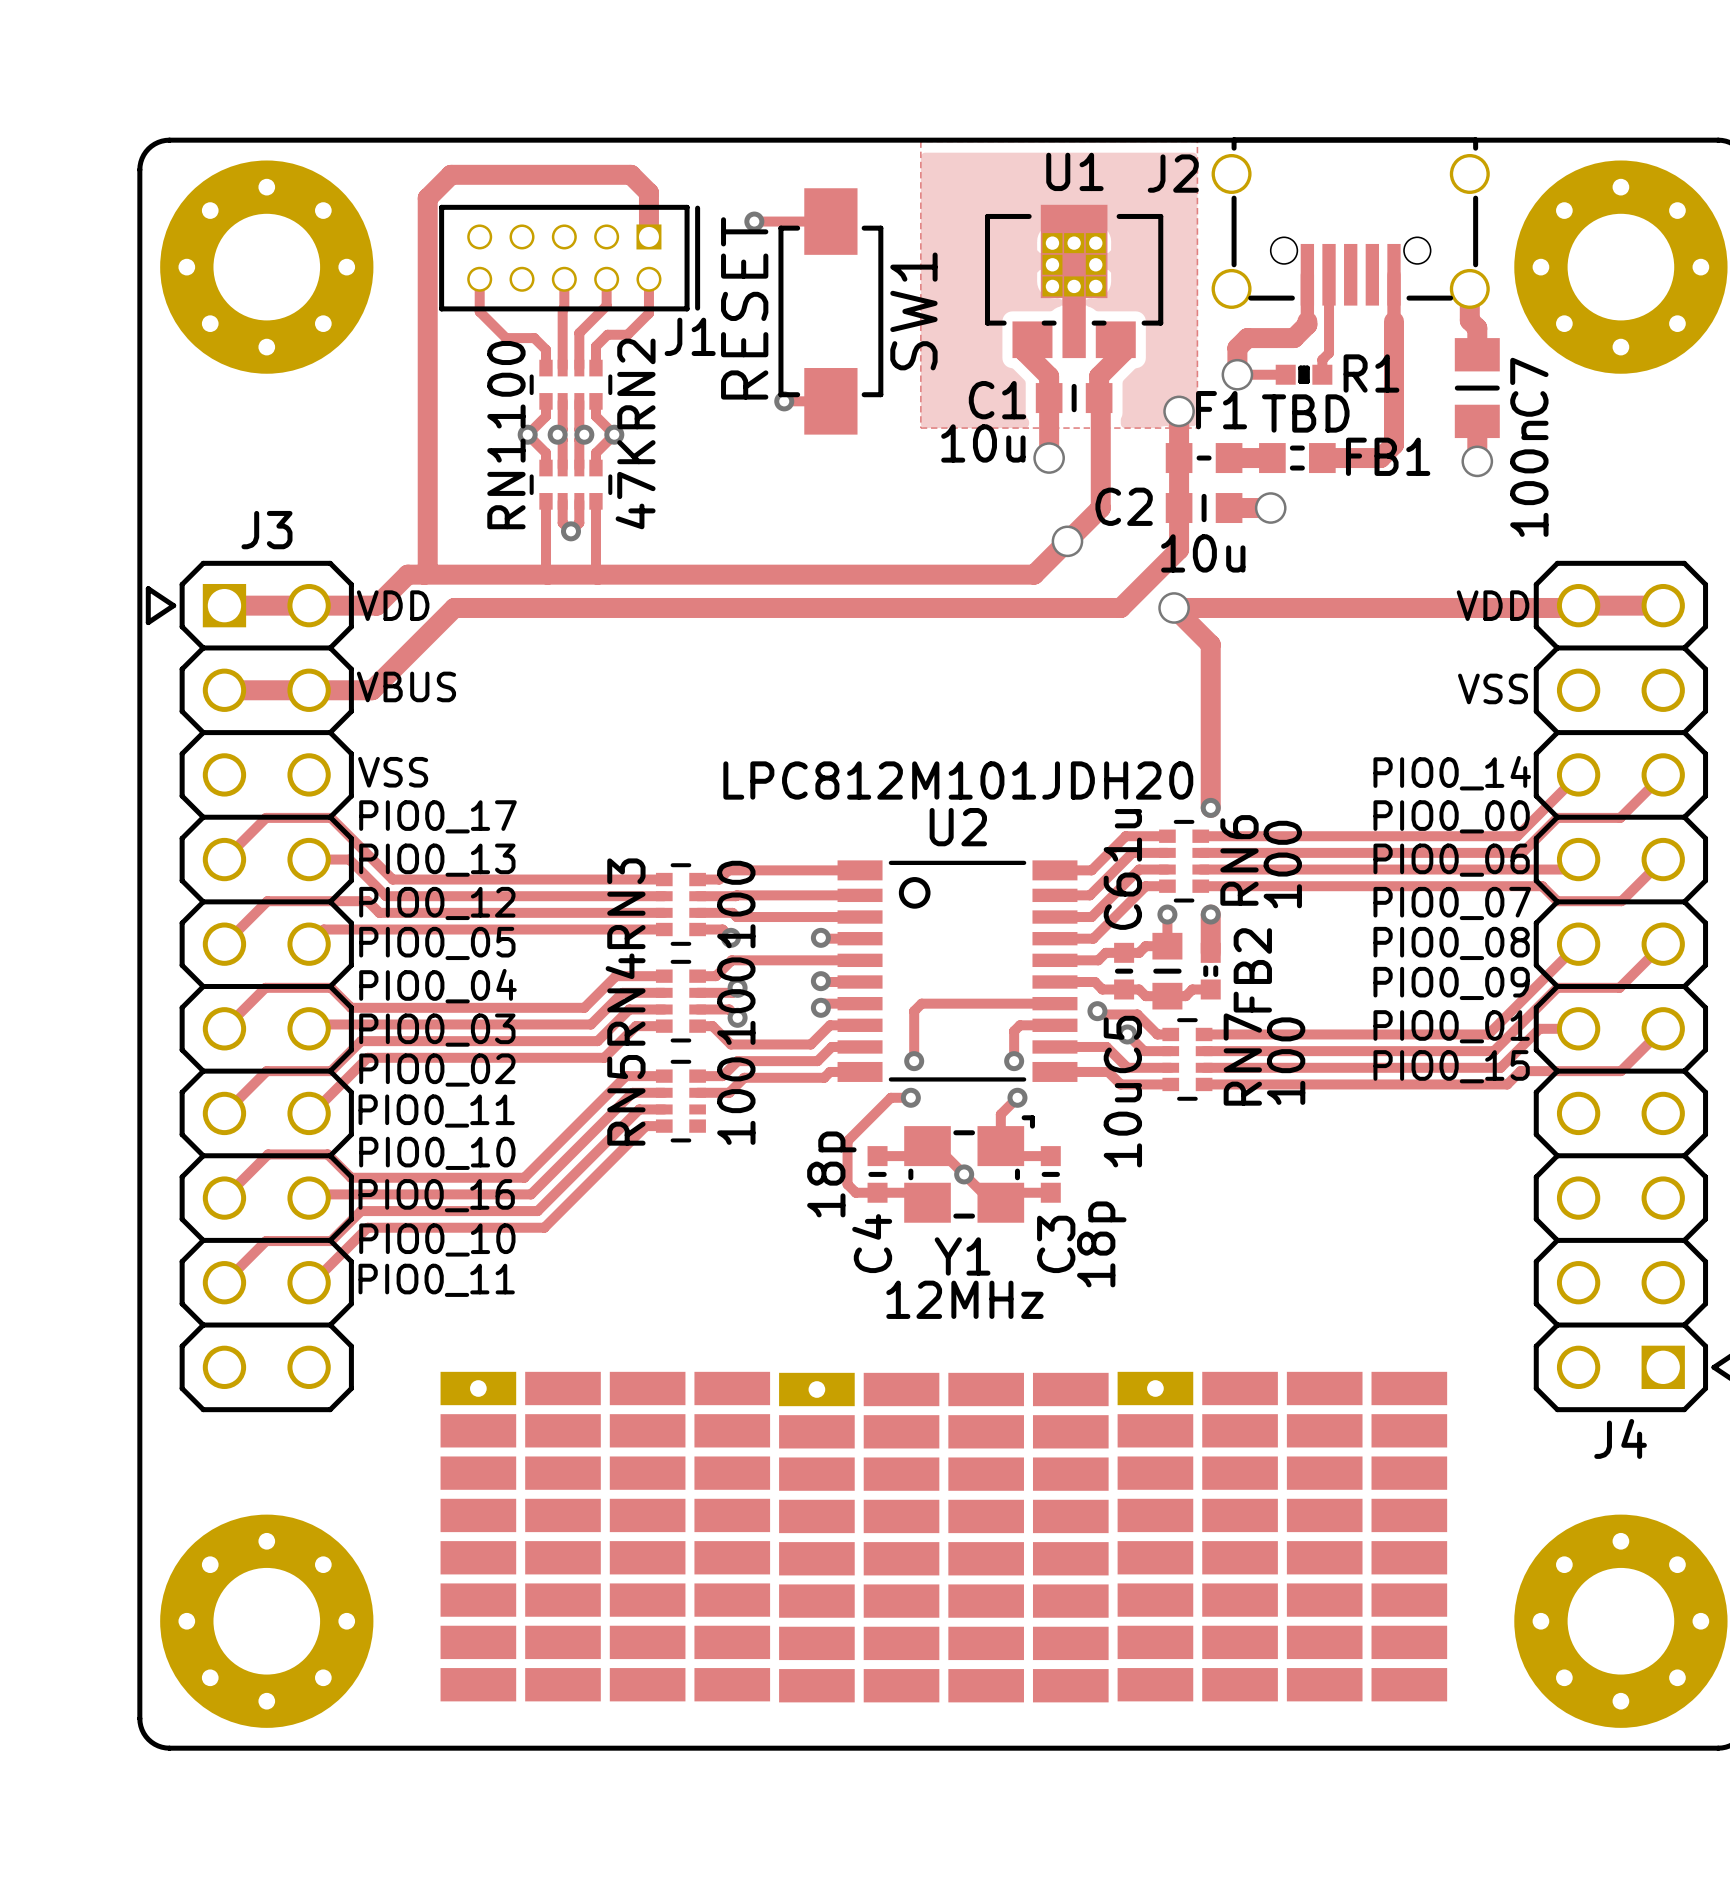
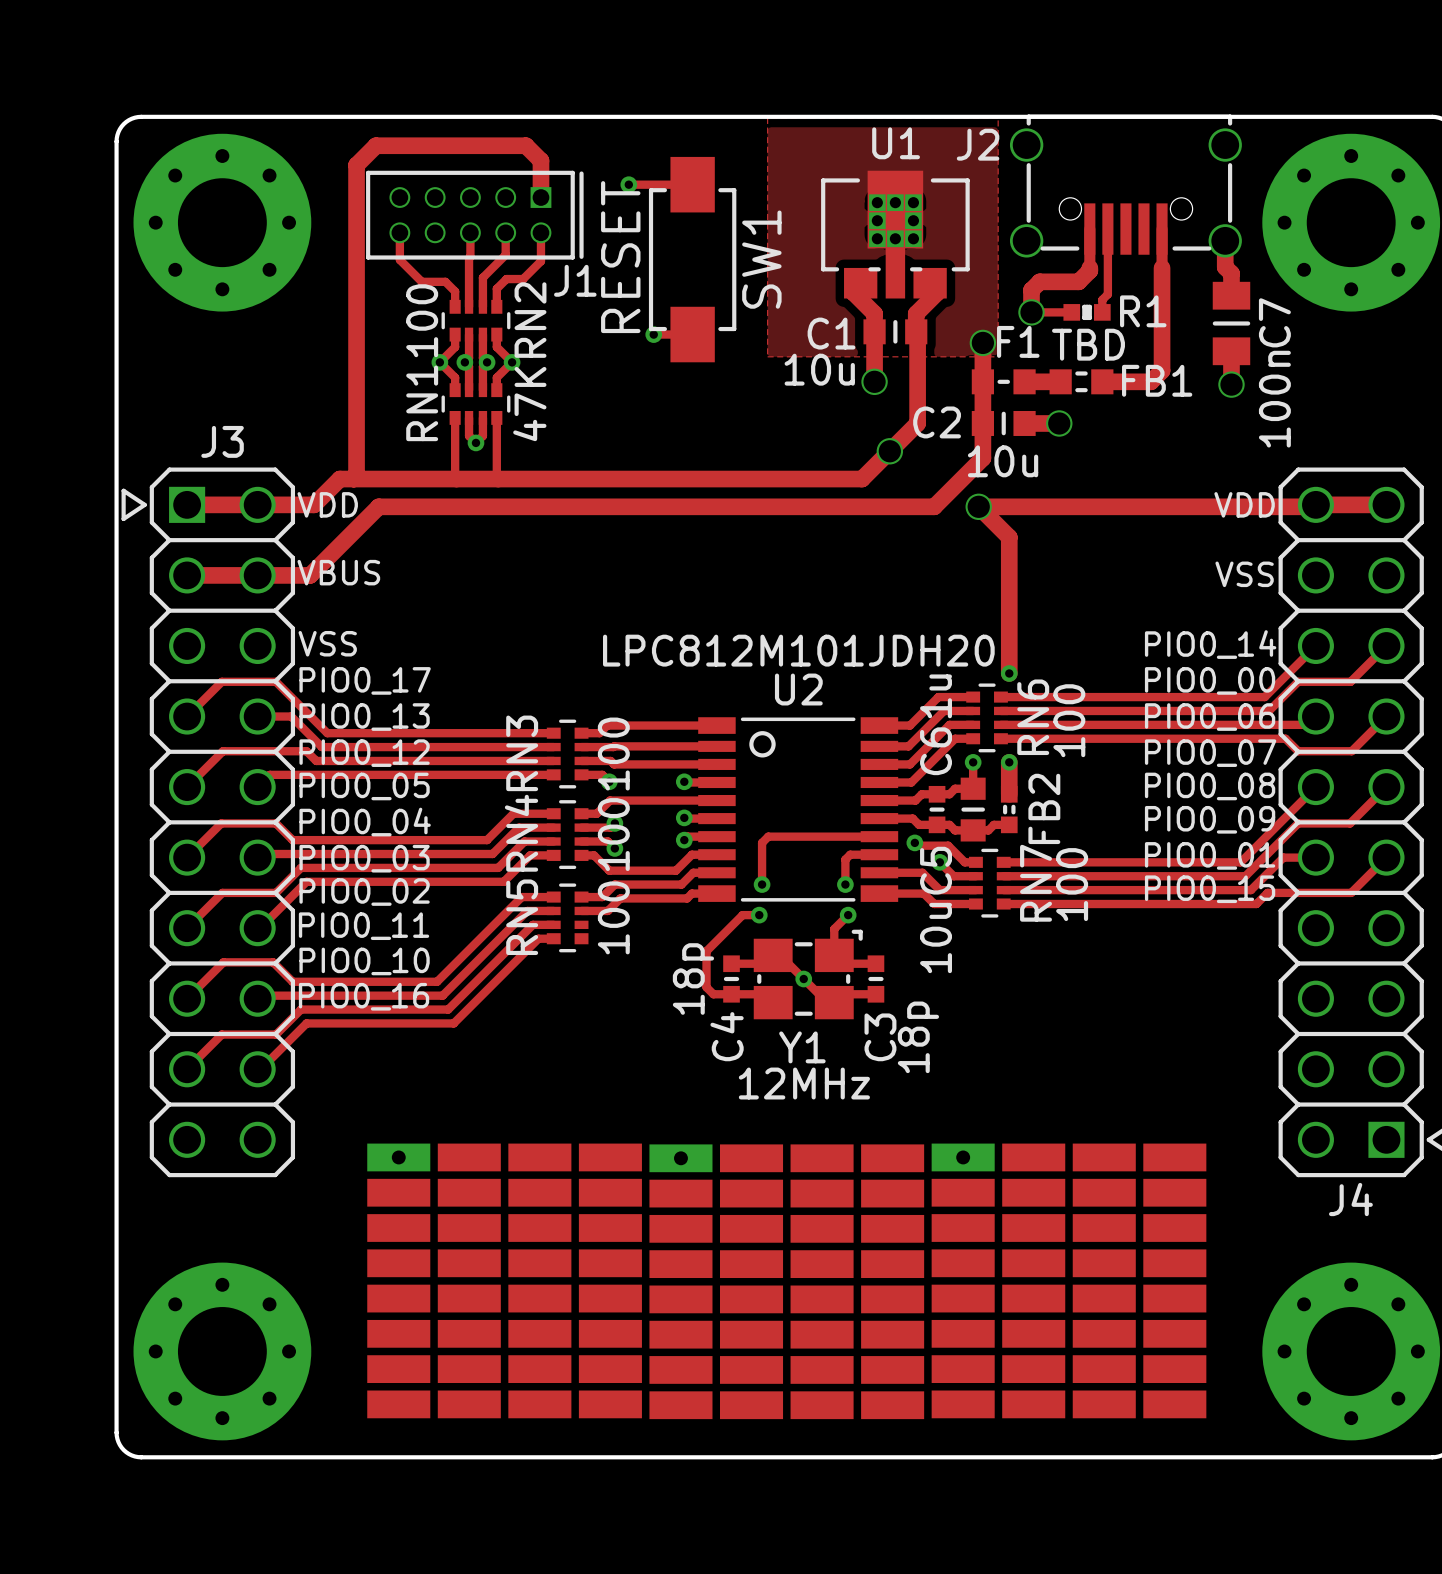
J3 text: PIO0_10 (437, 1240) -> none
J3 text: PIO0_11 (436, 1280) -> none

